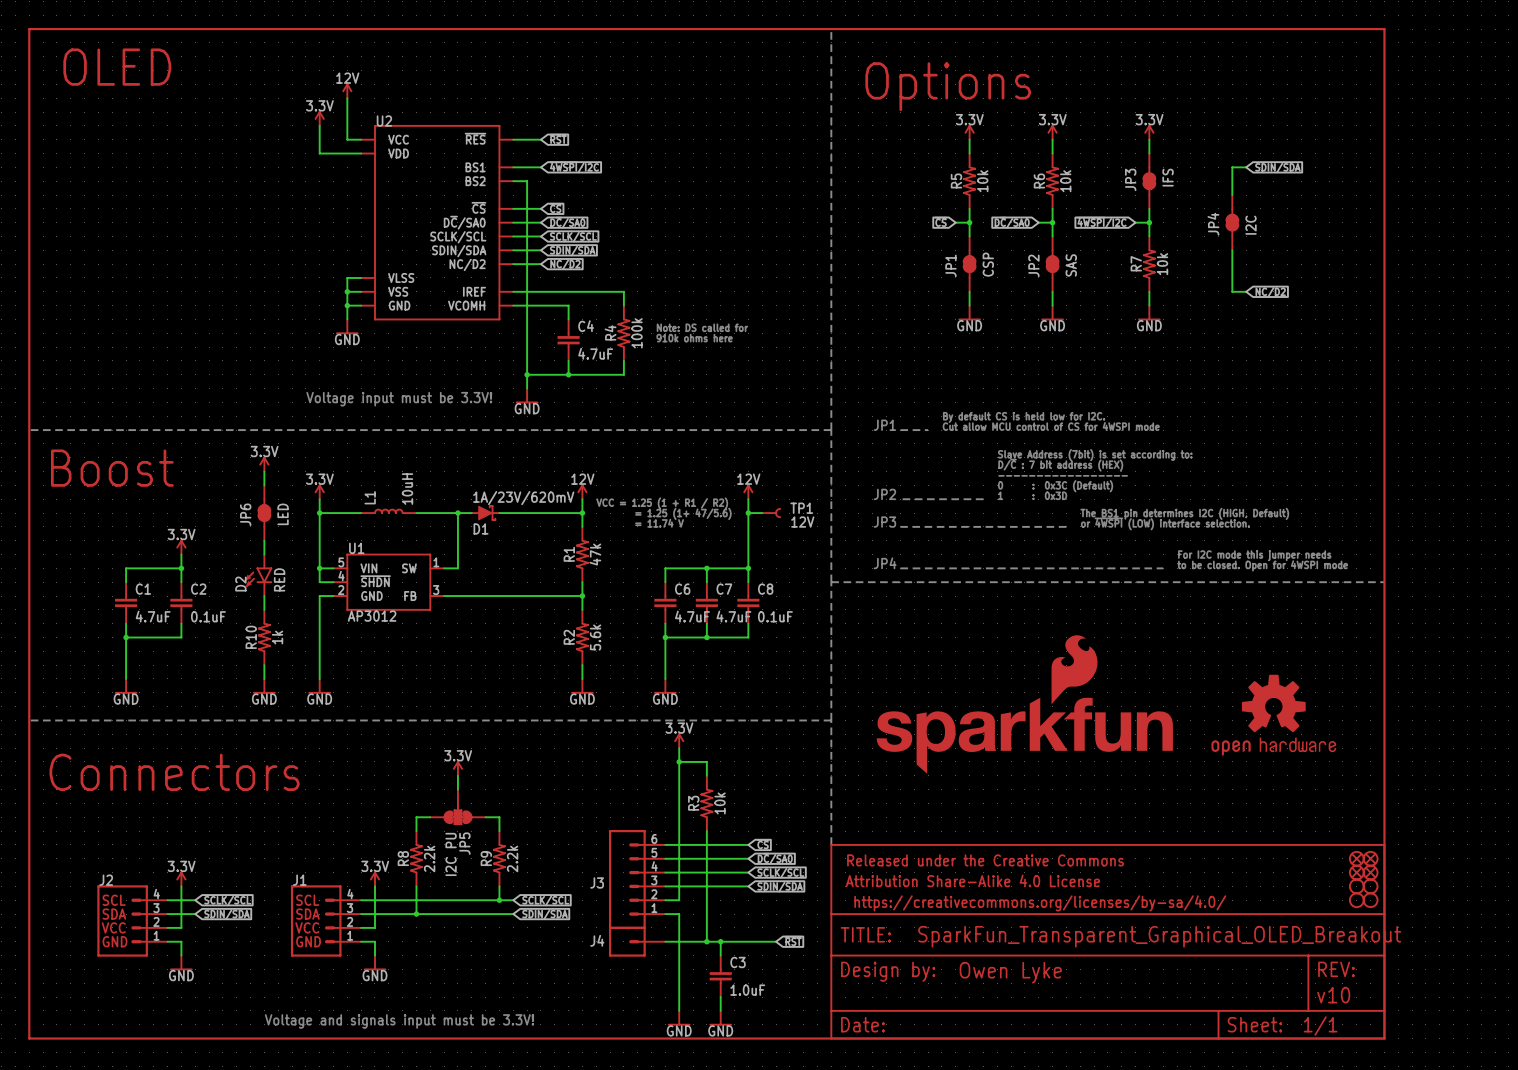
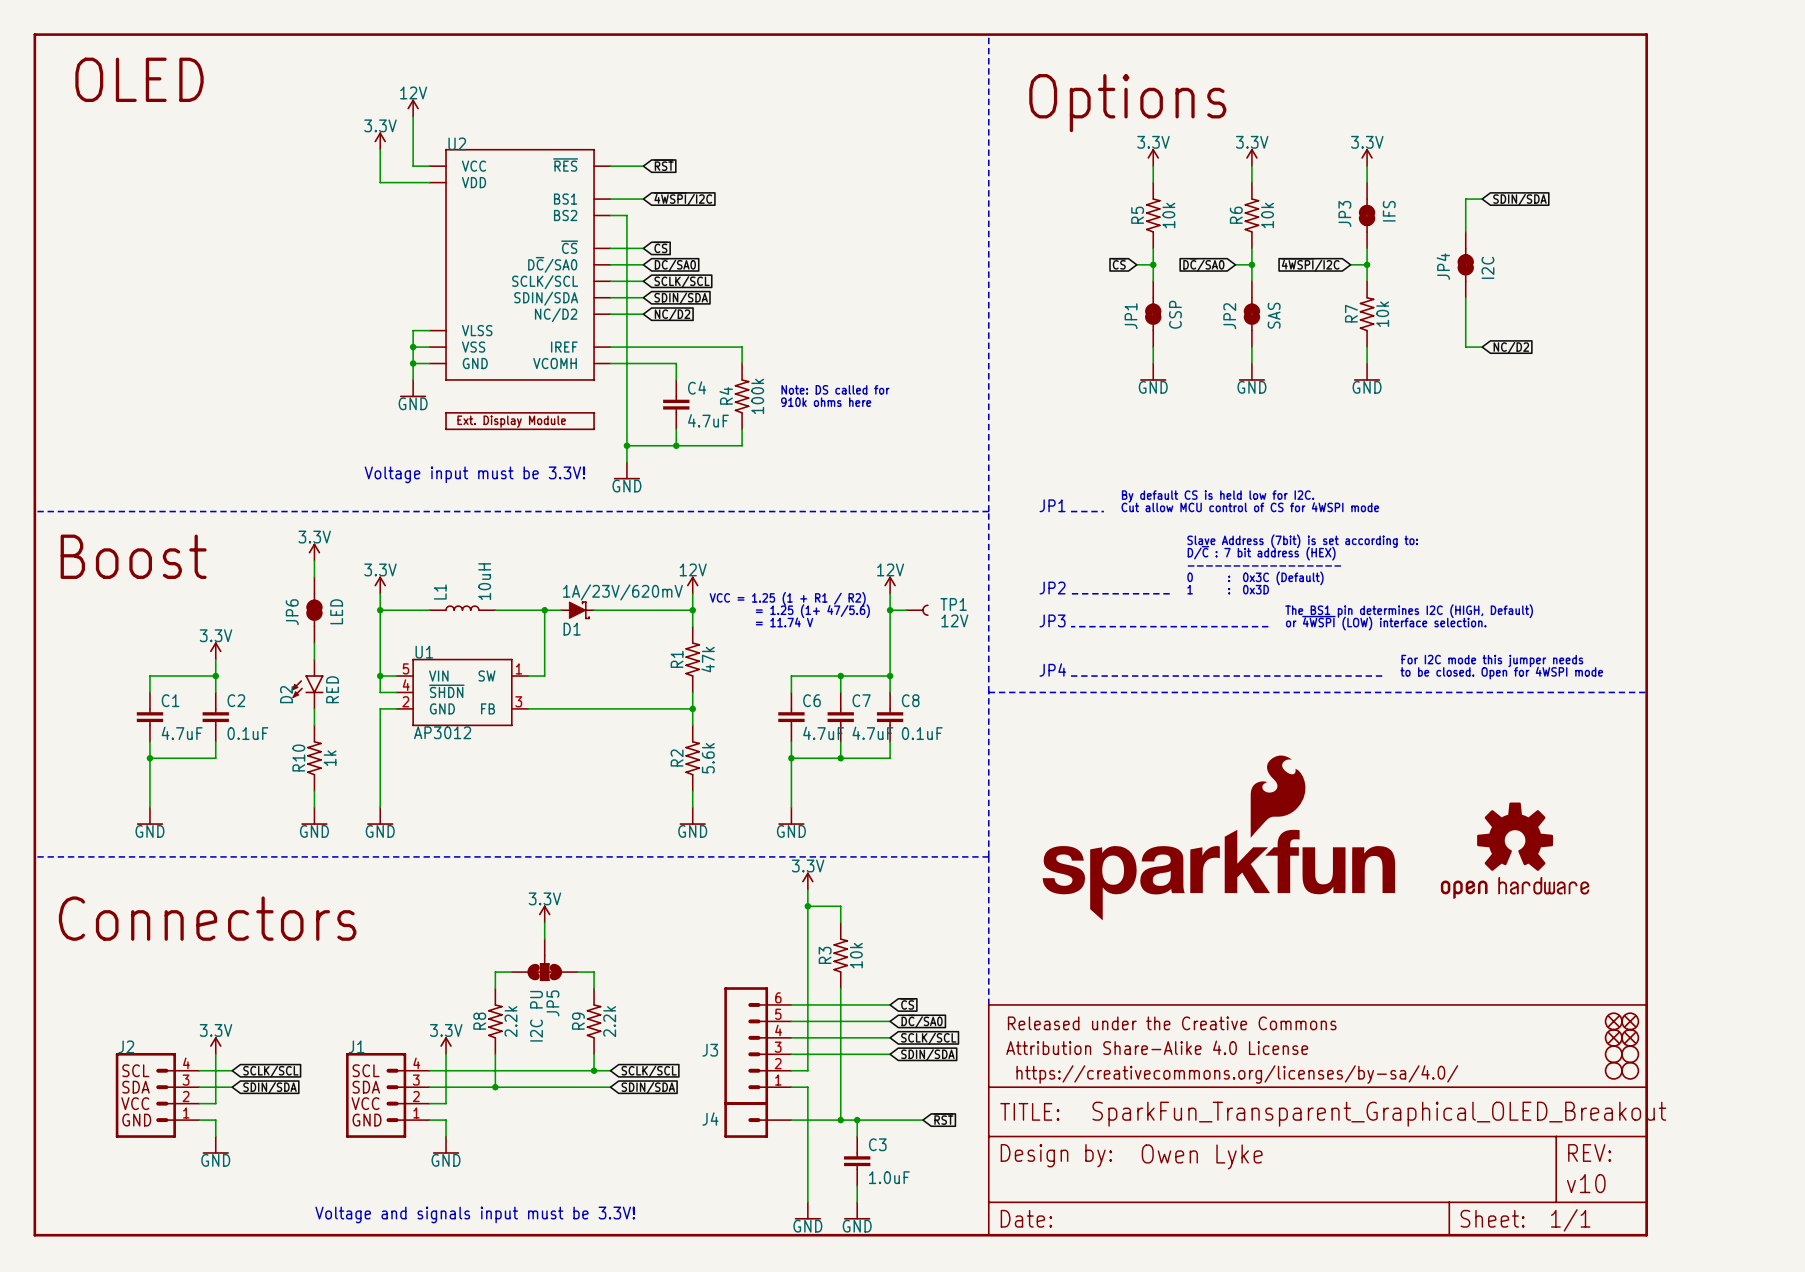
part: none -> (520, 421)

